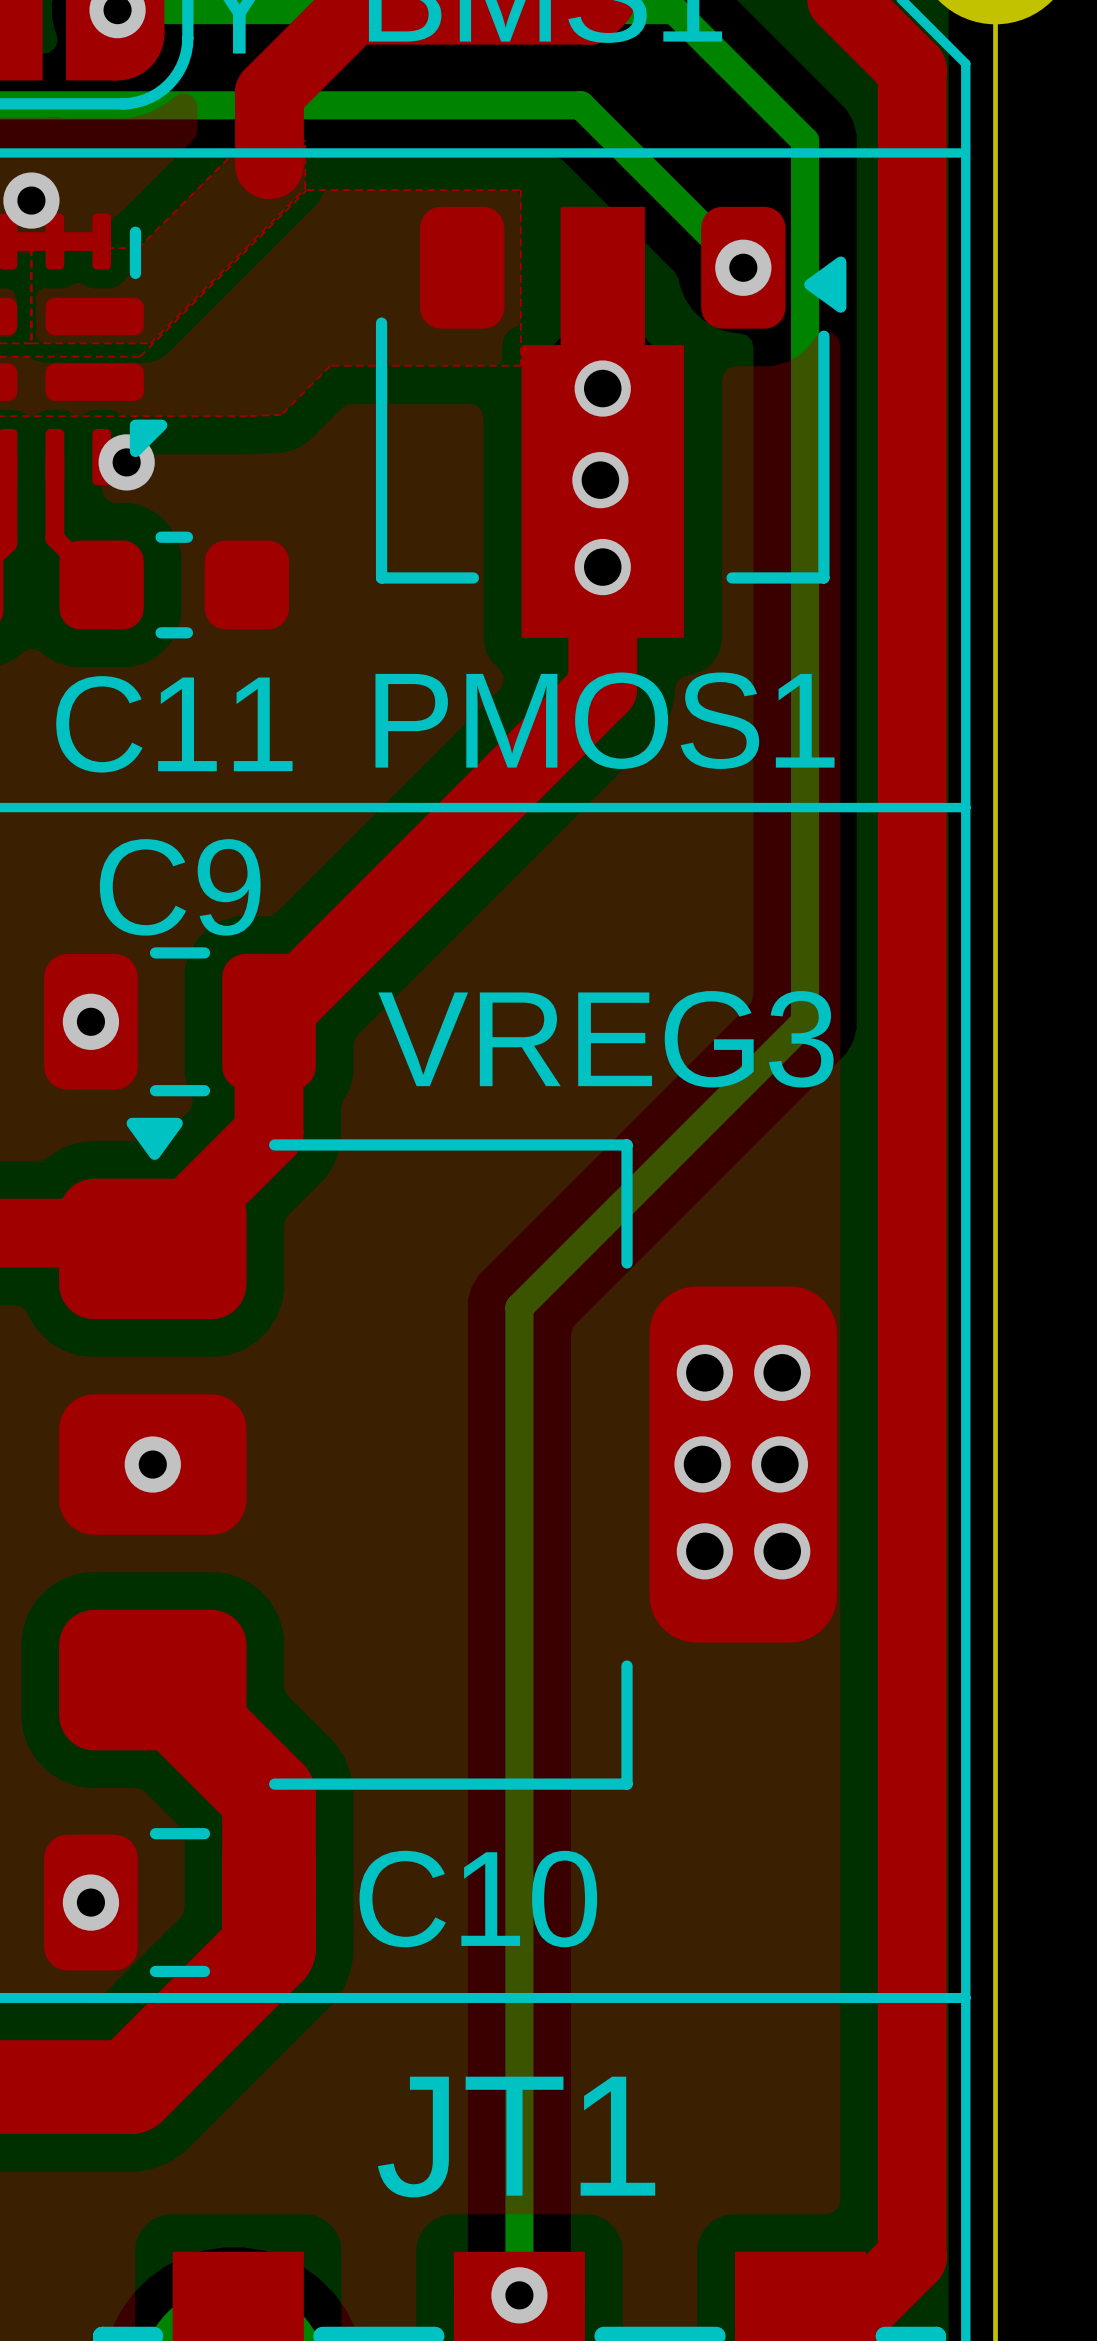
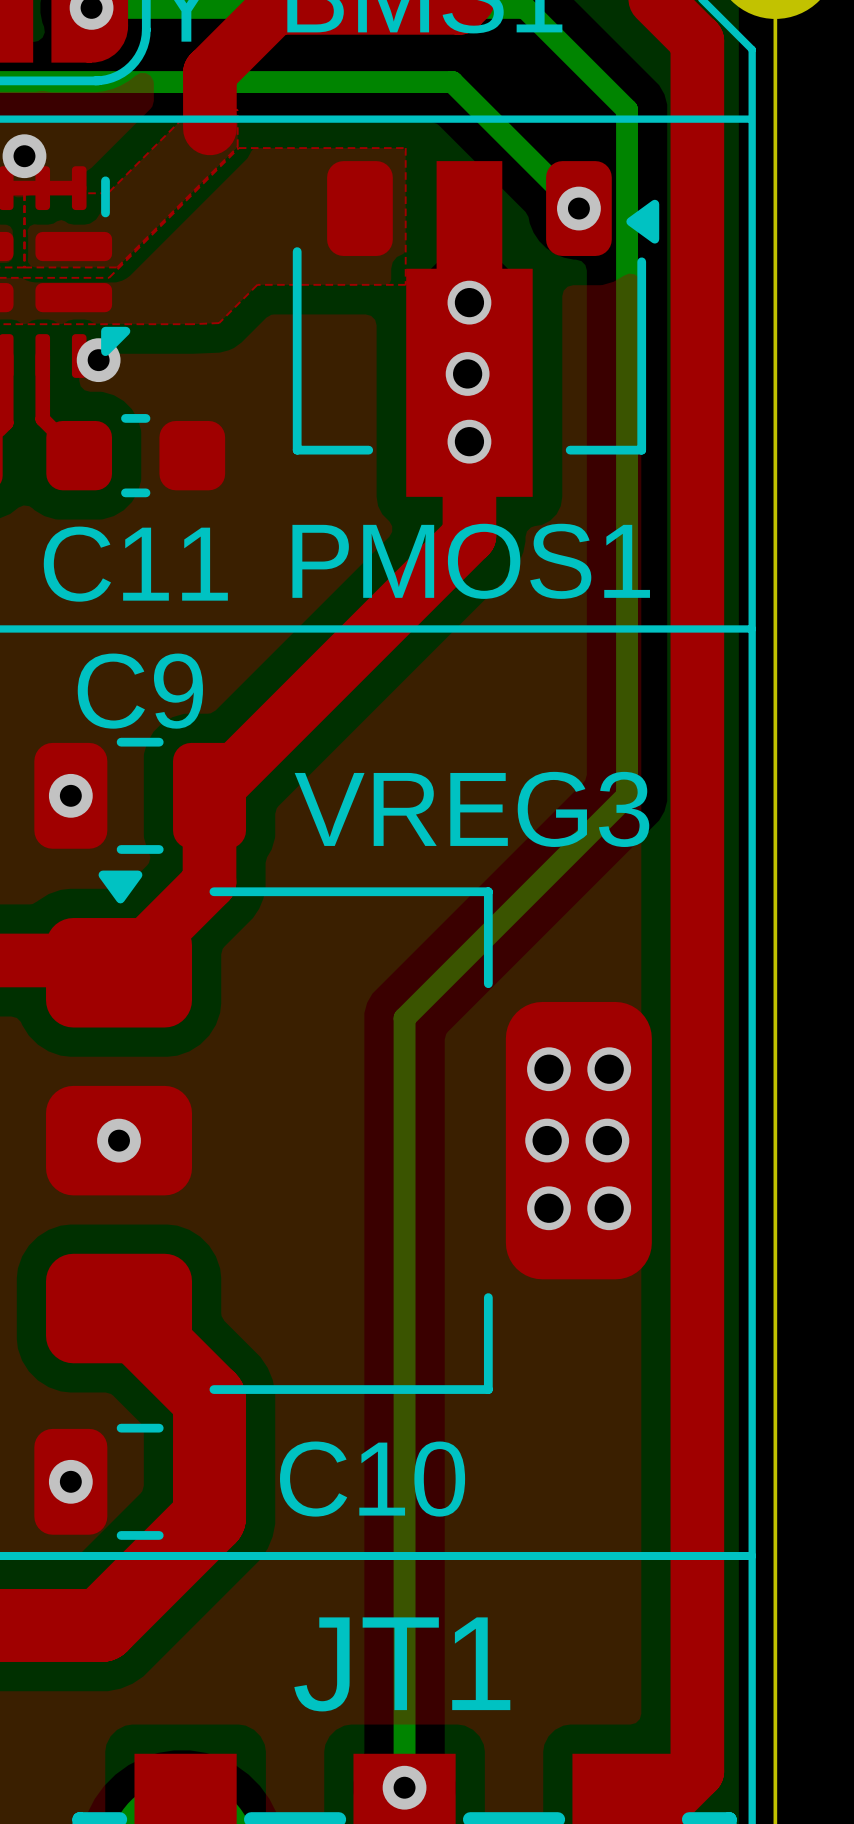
top track: (895, 52) (912, 69) (912, 2257) (895, 2274) -> (697, 41) (697, 1771)

